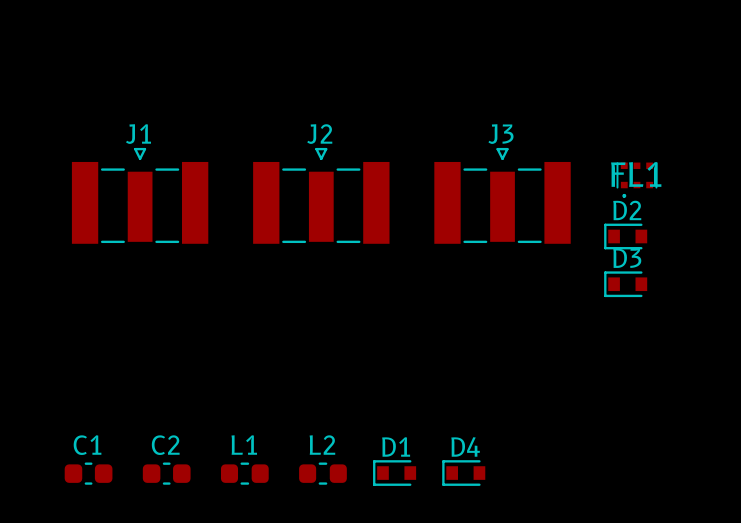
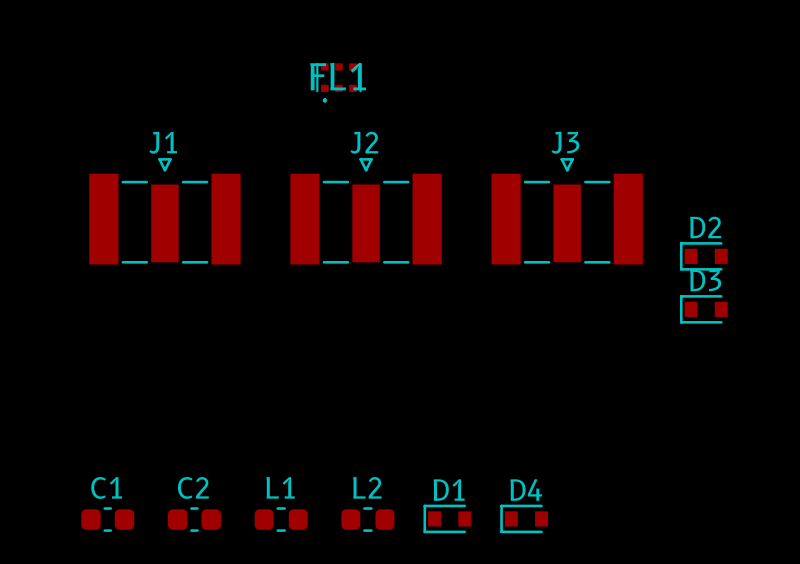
FL1 position: (636, 180) -> (338, 82)

